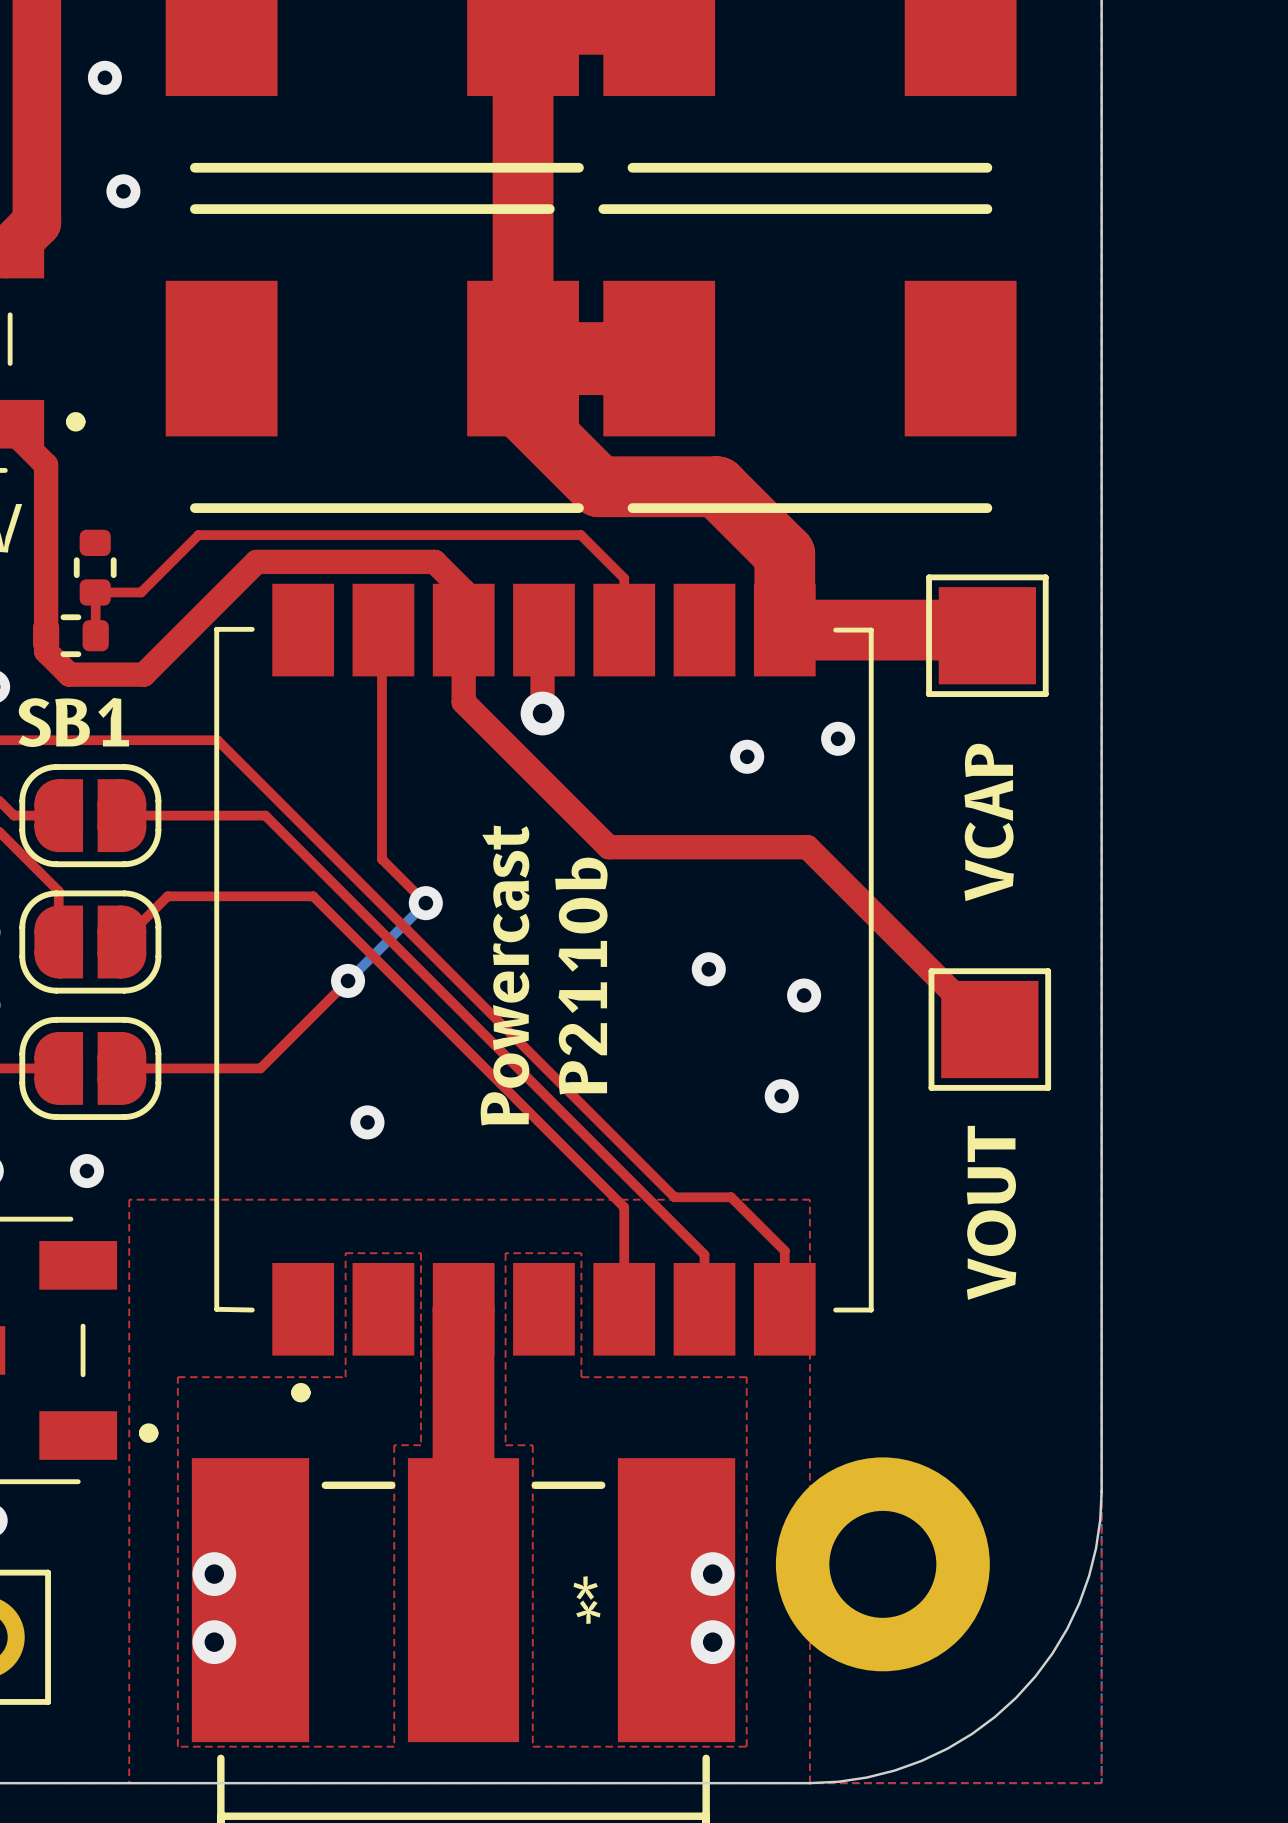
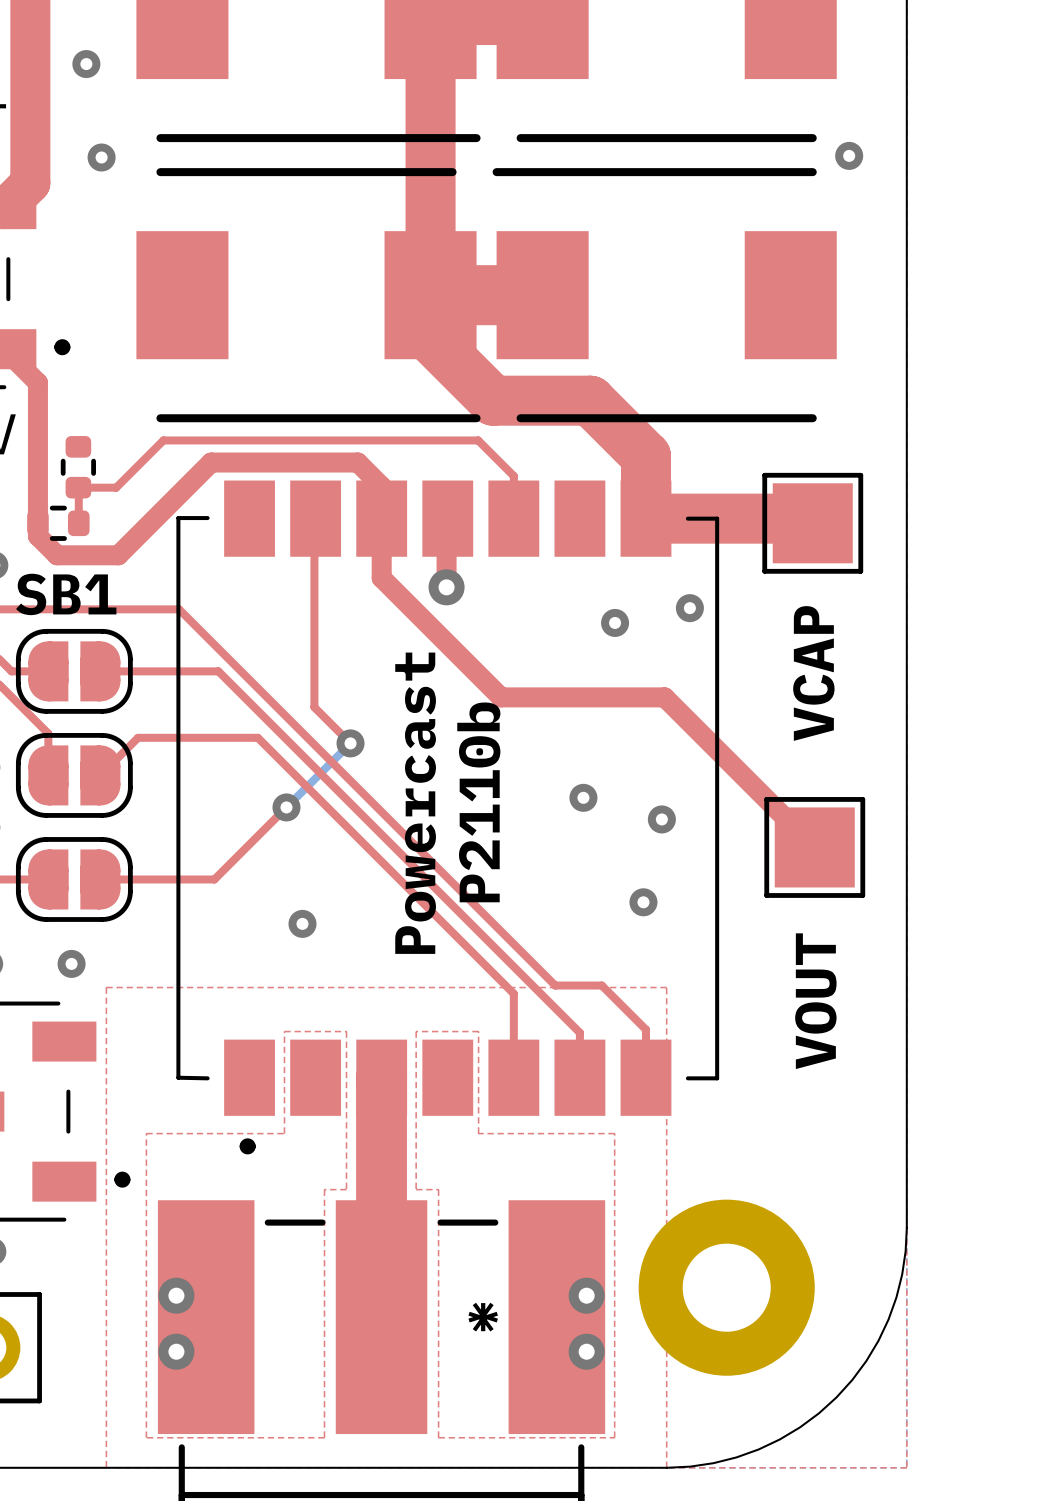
via: none -> (849, 155)

